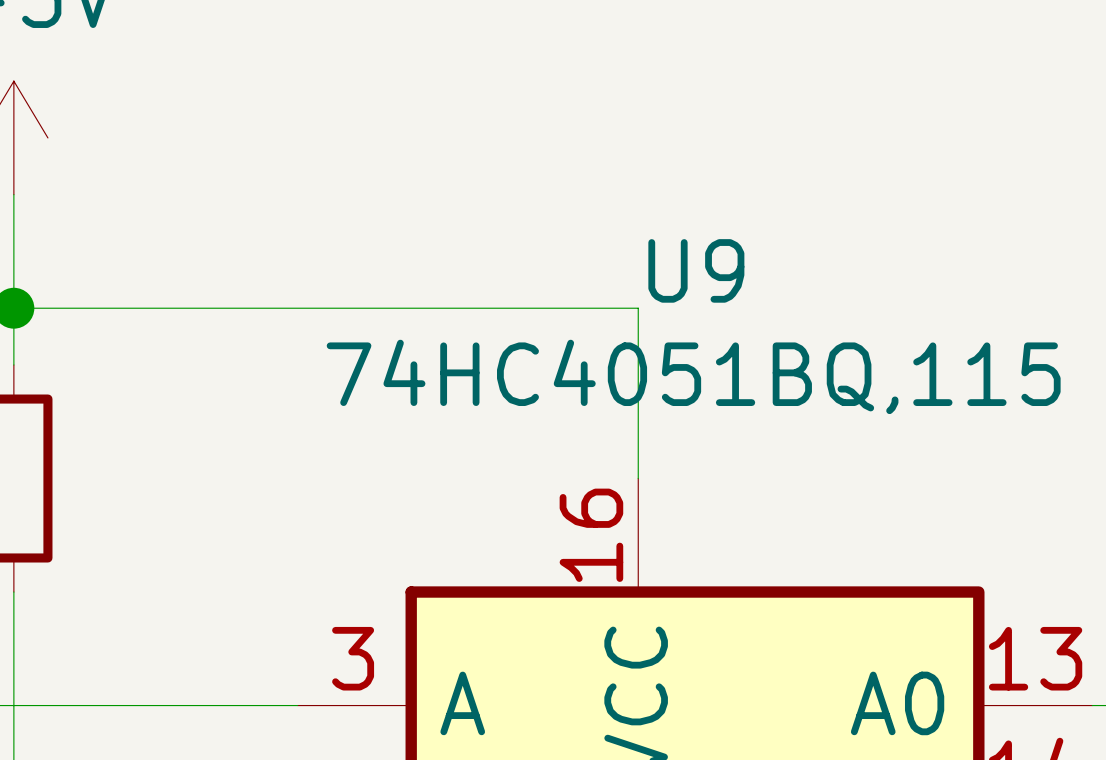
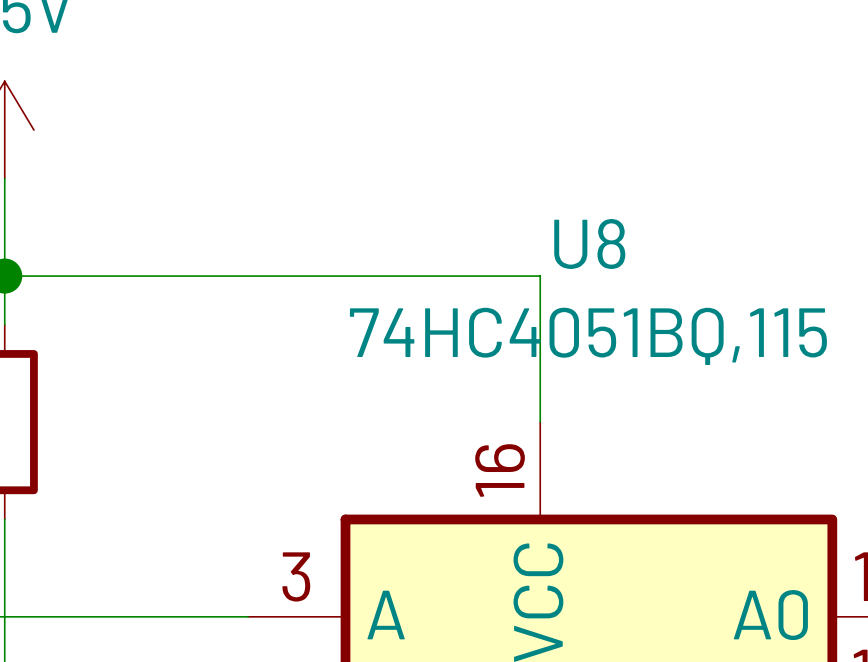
U9 name: U9 (696, 270) -> U8 (589, 243)

